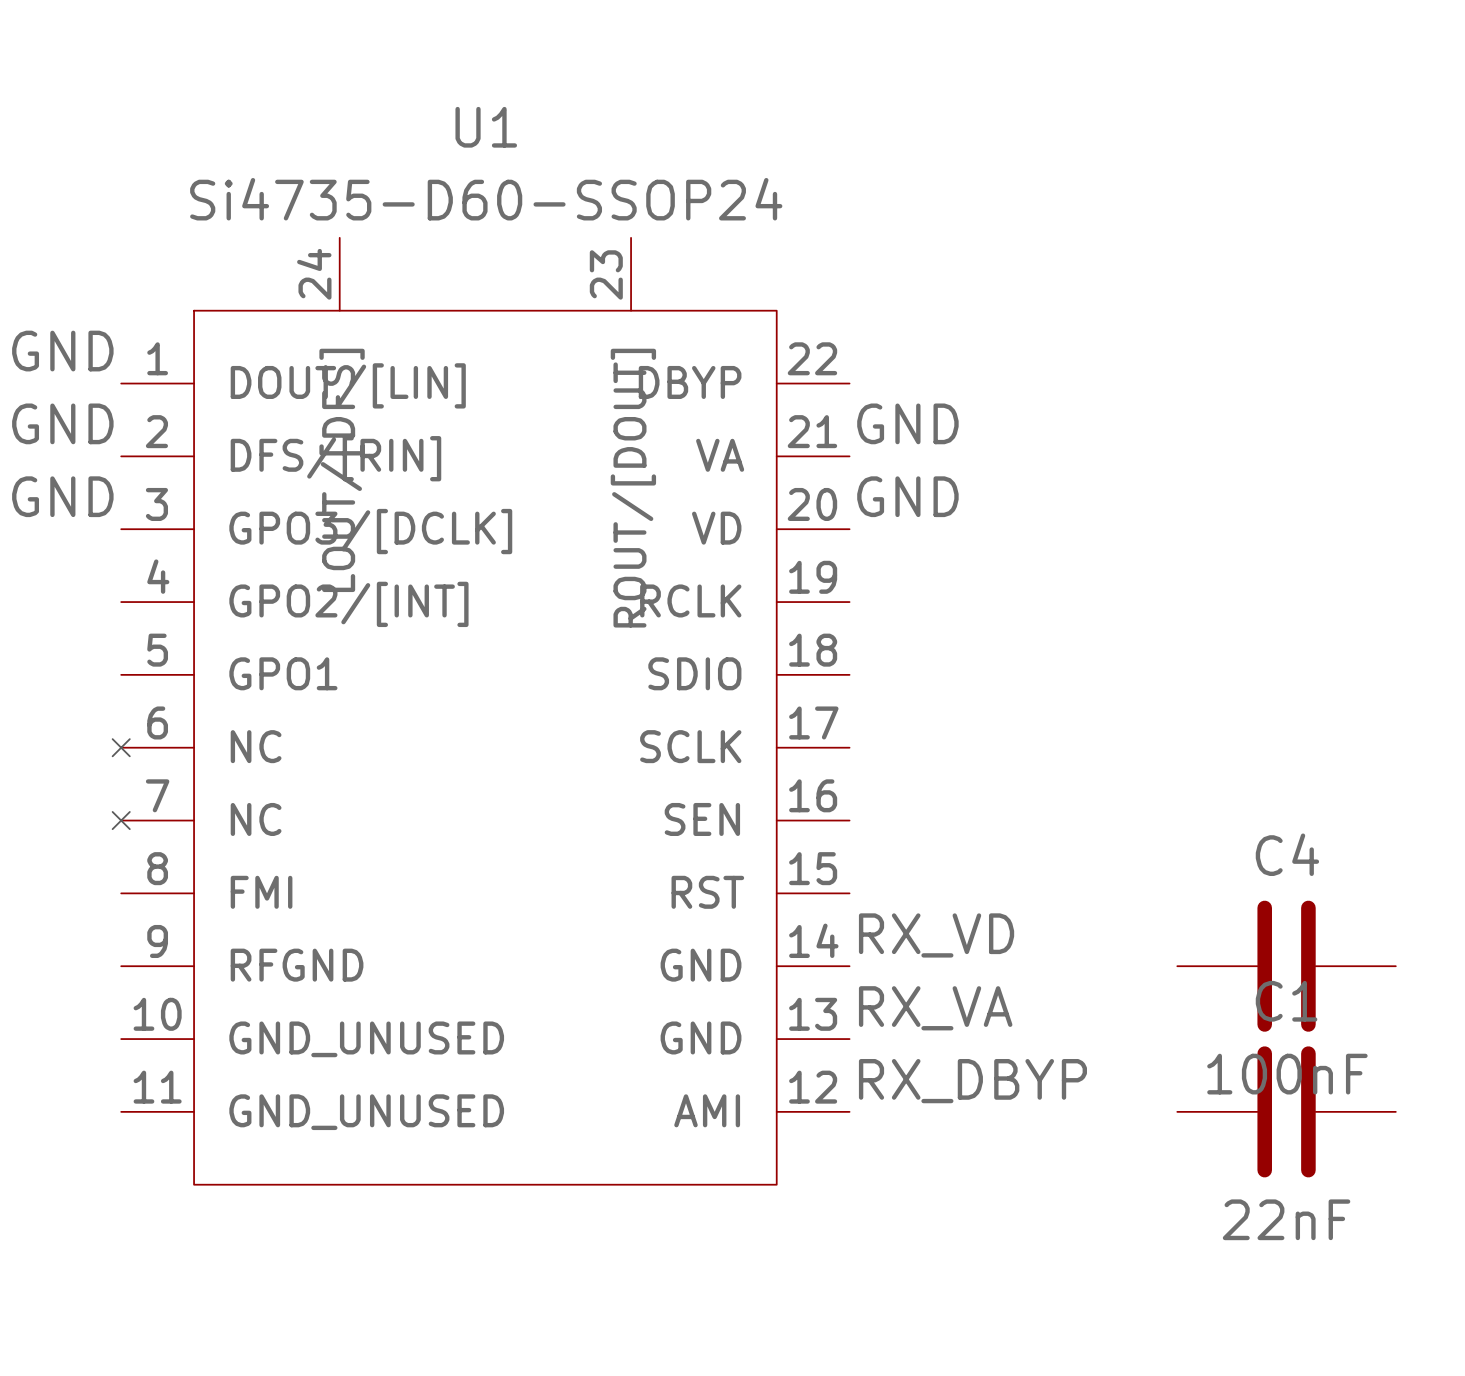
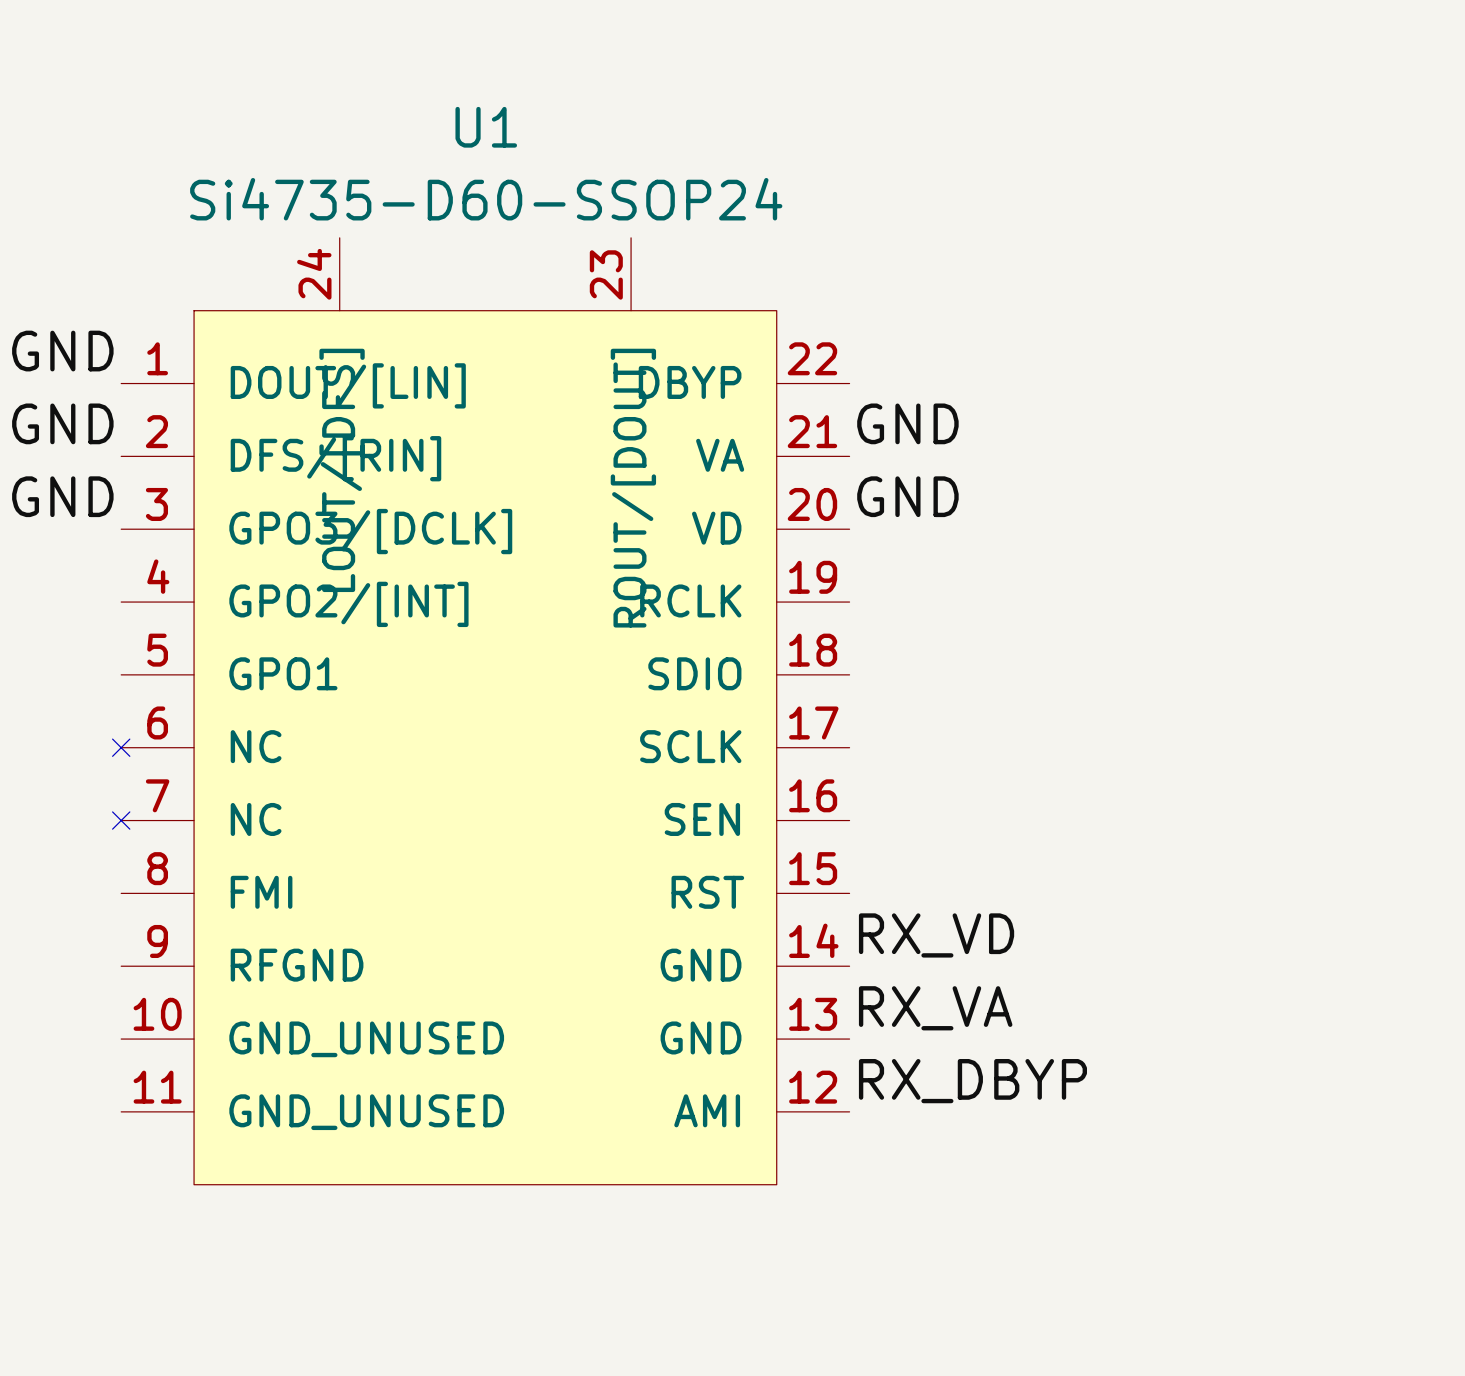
C4: 100nF (1286, 966) -> none
C1: 22nF (1286, 1111) -> none

